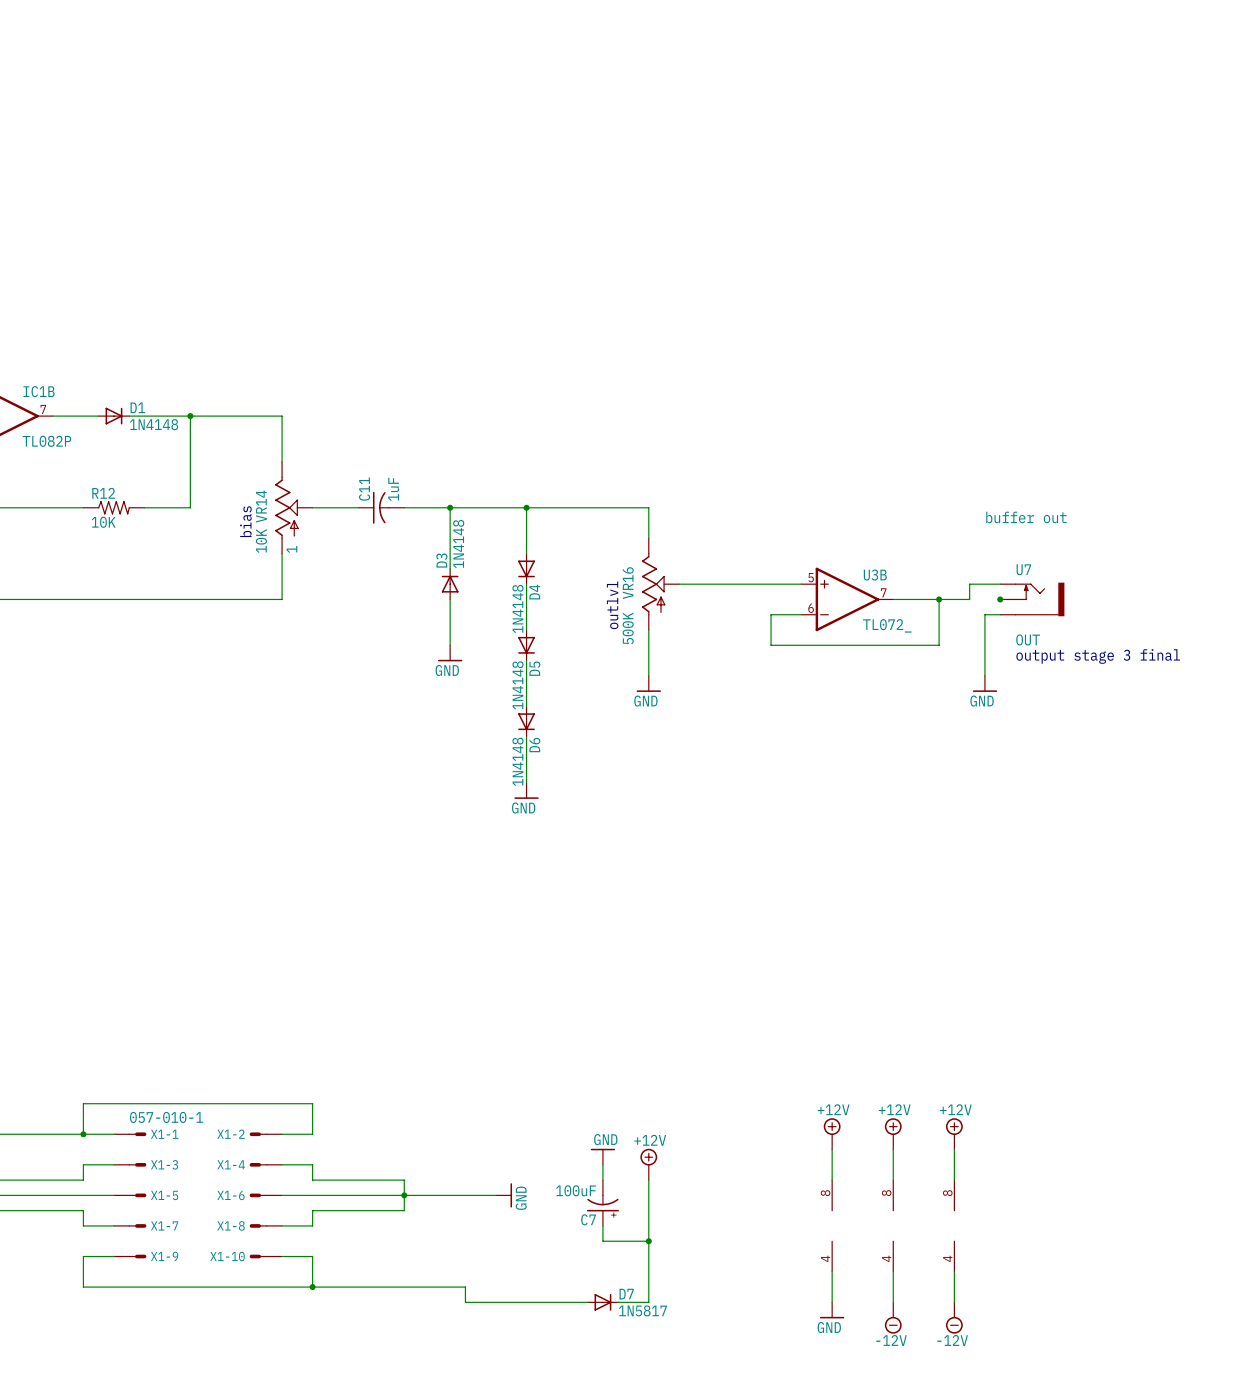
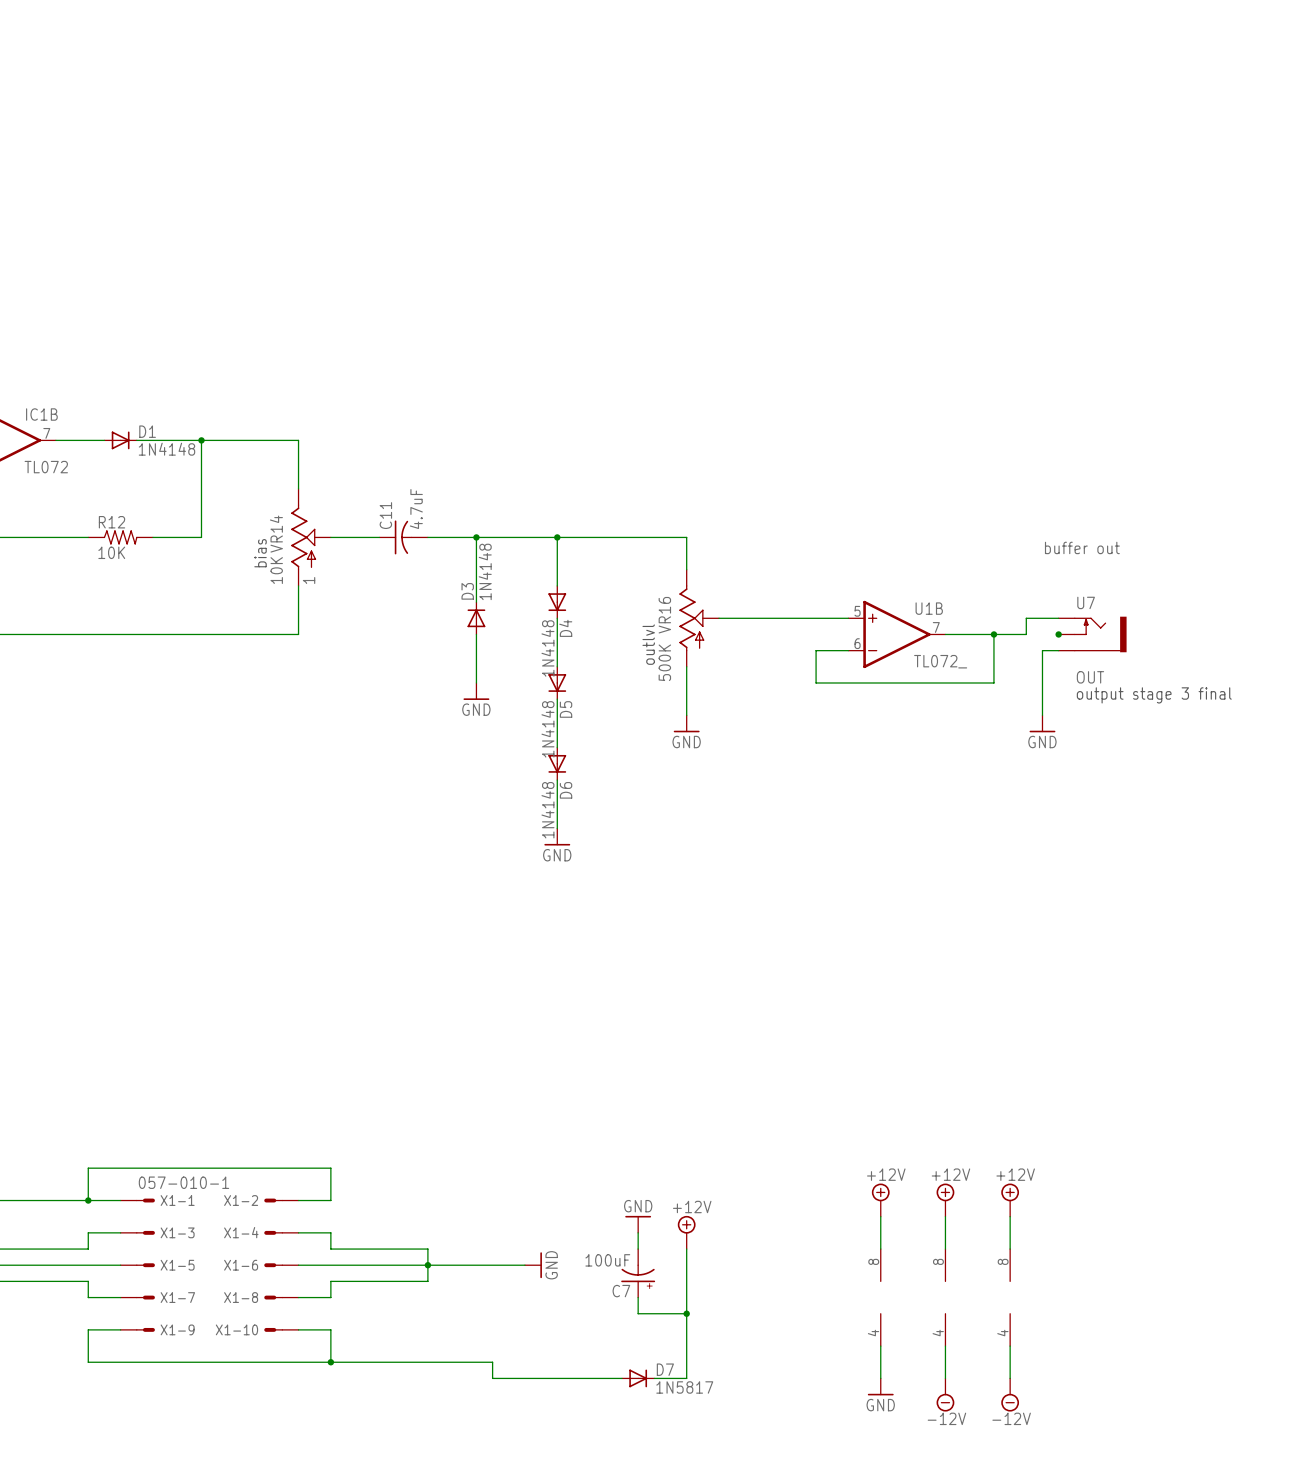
IC1B value: TL082P (46, 441) -> TL072 (46, 467)
C11 value: 1uF (393, 489) -> 4.7uF (416, 509)
U3B name: U3B (875, 575) -> U1B (929, 608)

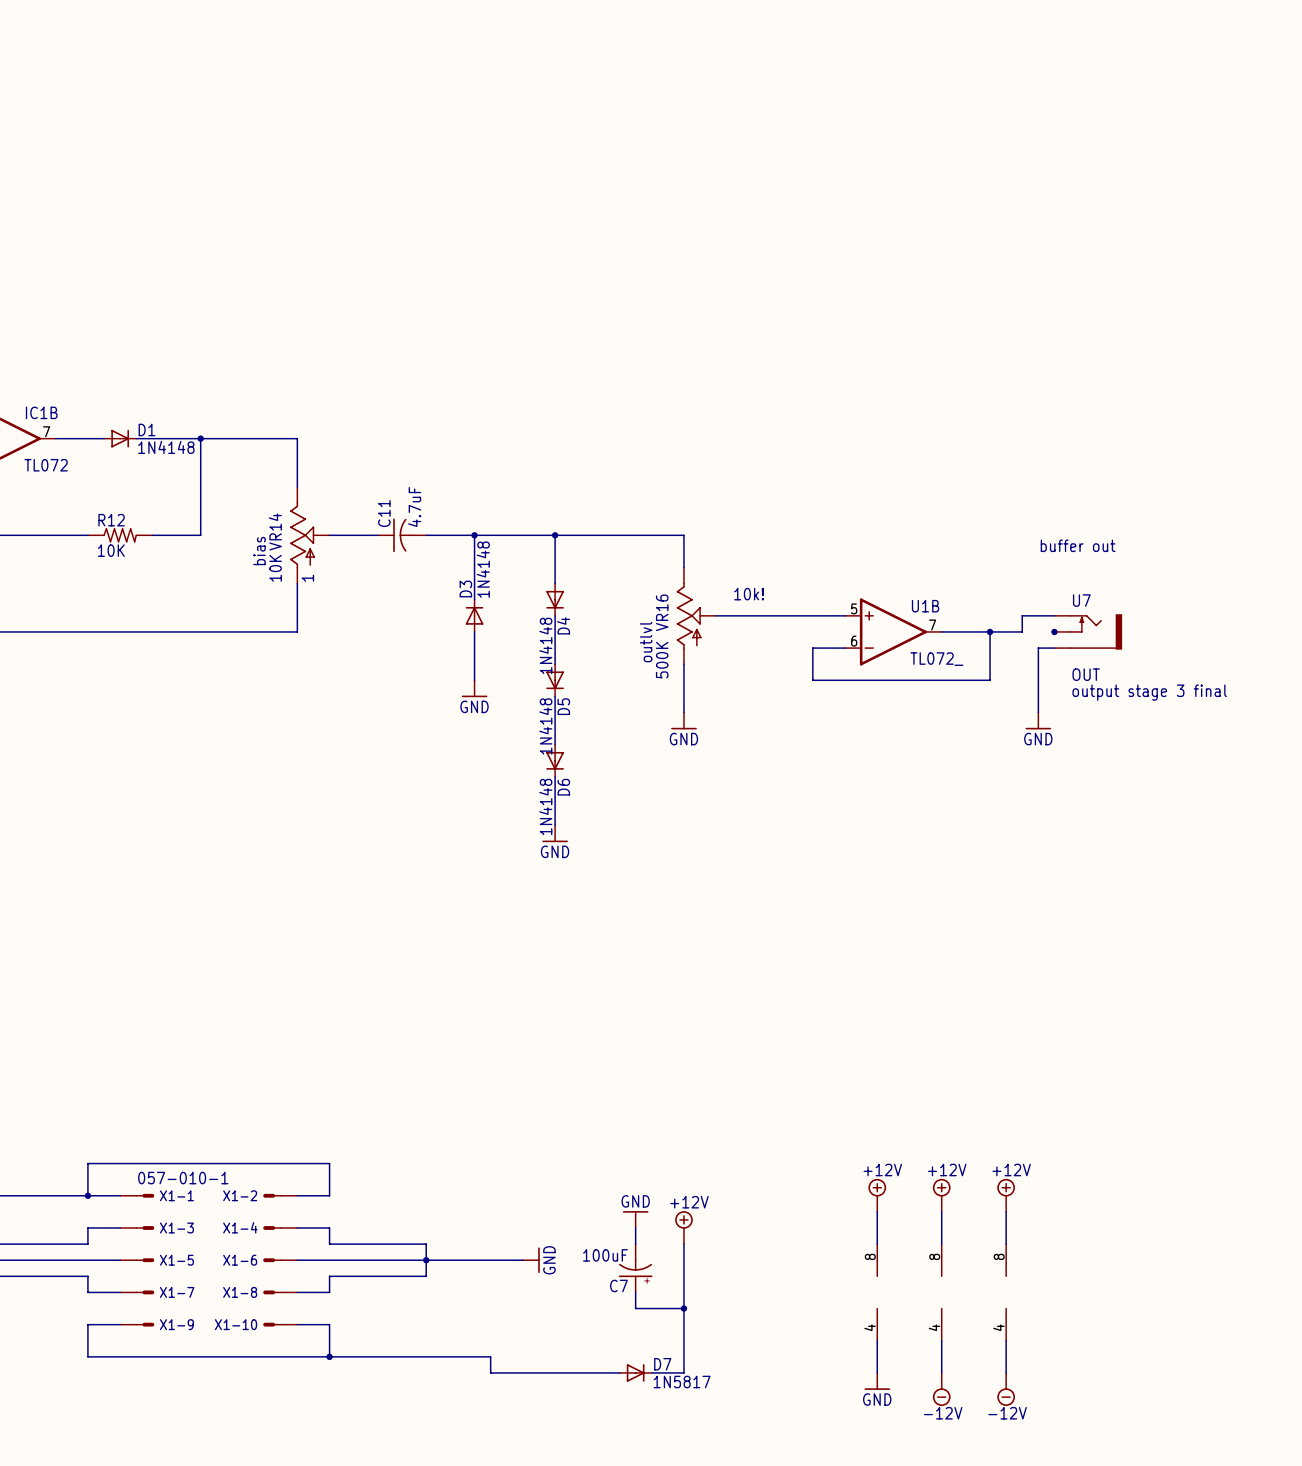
text: none -> 10k! (749, 594)

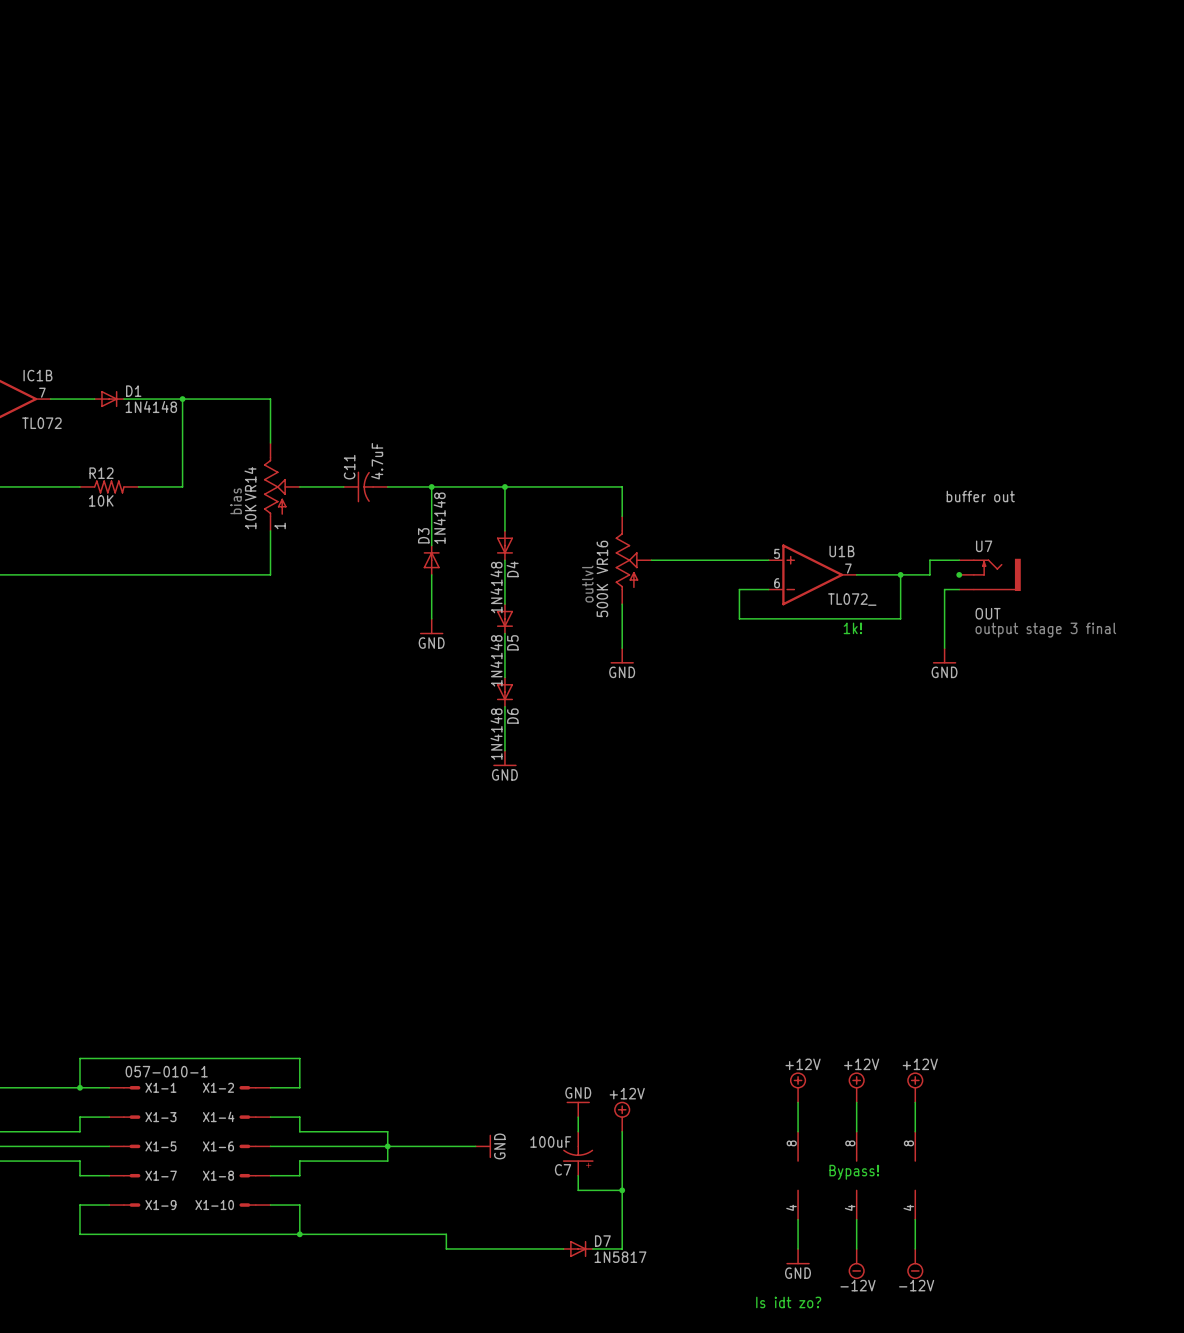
text: 10k! (749, 594) -> none
text: none -> 1k! (852, 628)
text: none -> Bypass! (854, 1172)
text: none -> Is idt zo? (788, 1302)

